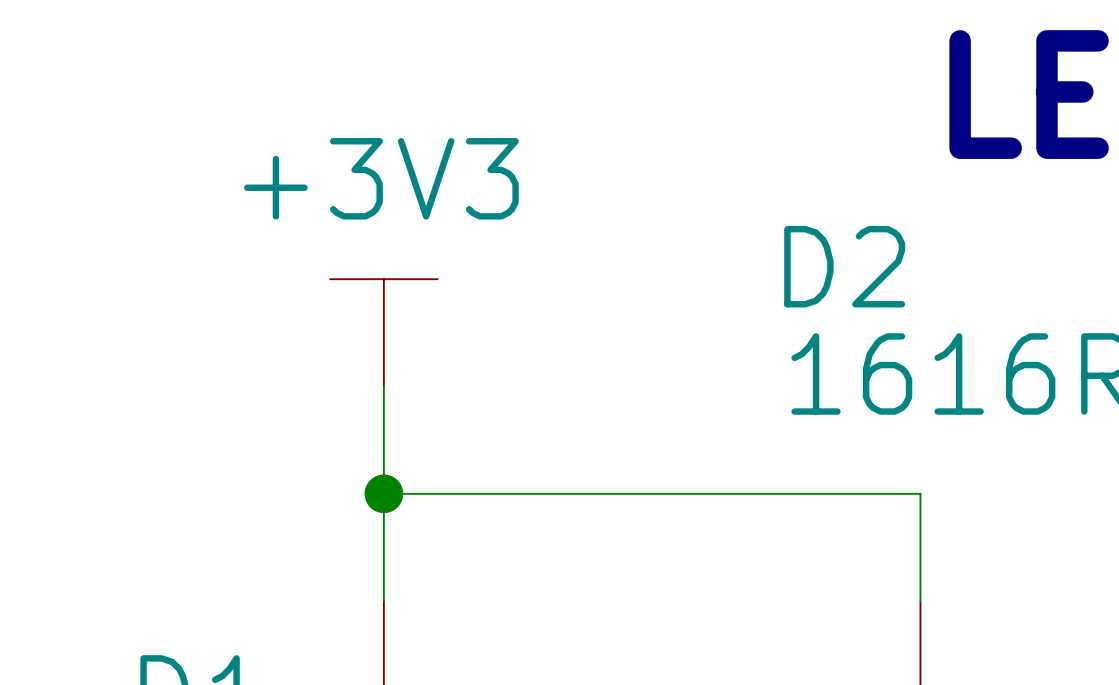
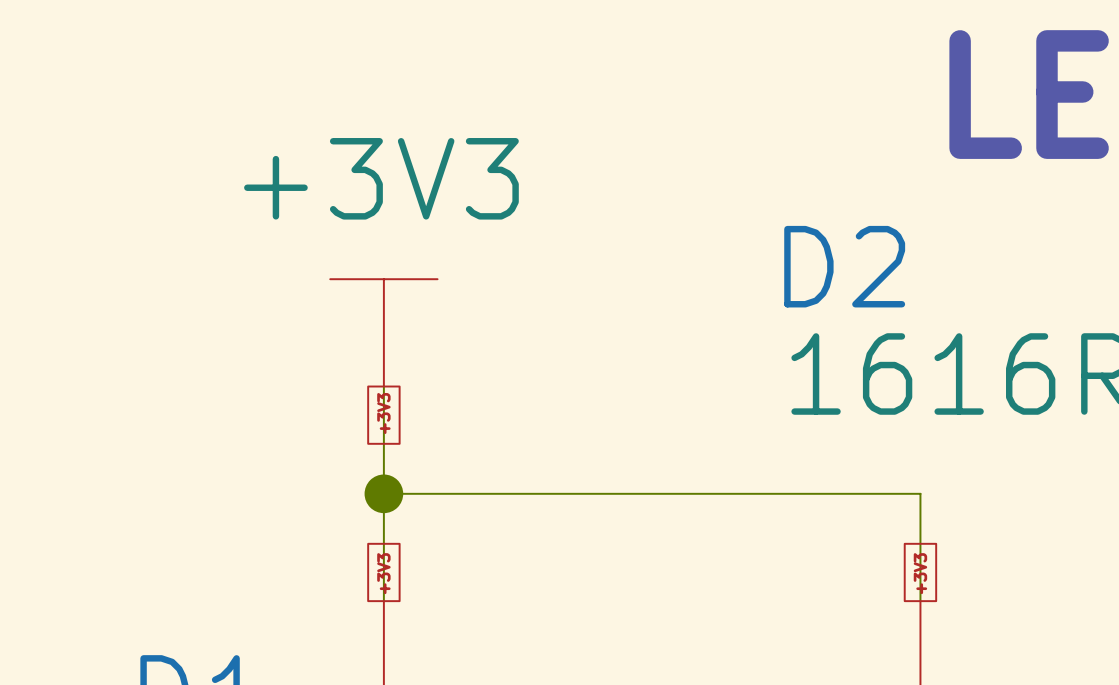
global label: none -> +3V3 (383, 413)
global label: none -> +3V3 (383, 573)
global label: none -> +3V3 (920, 573)

